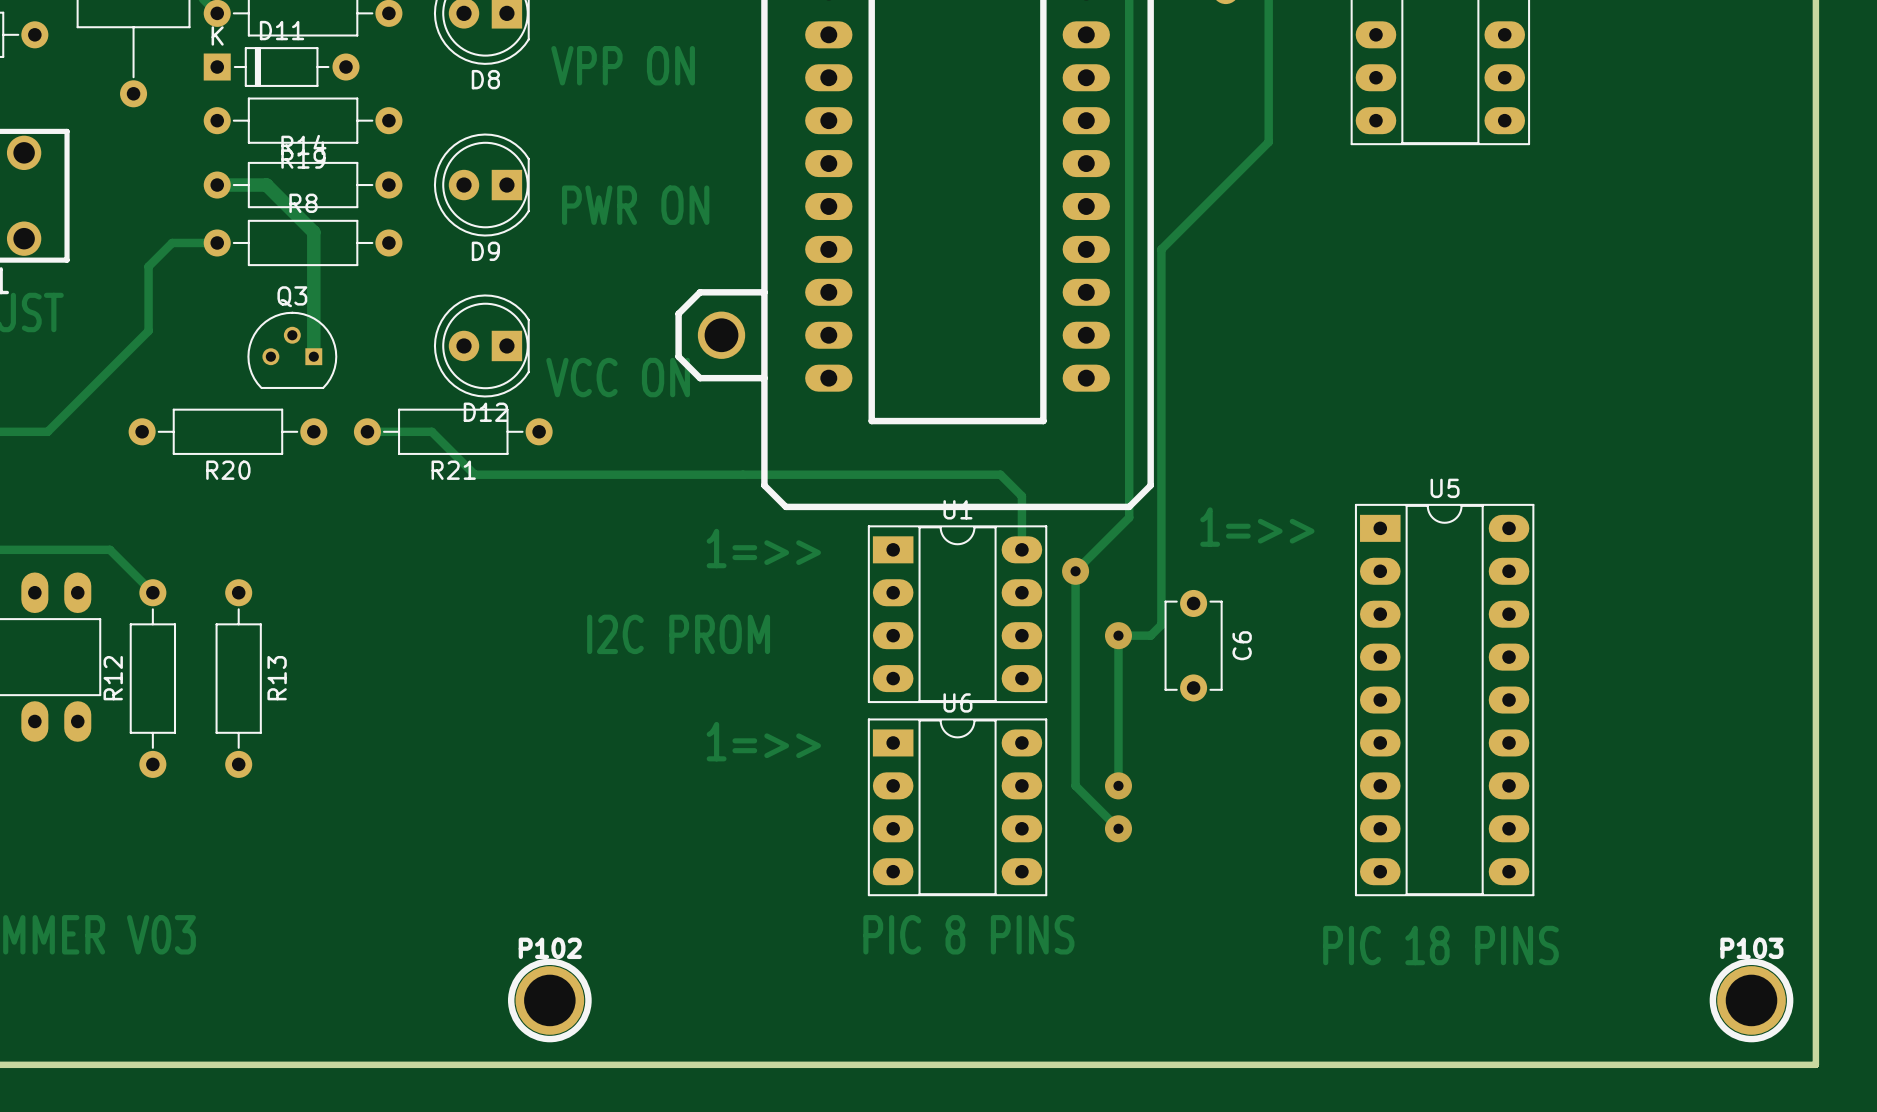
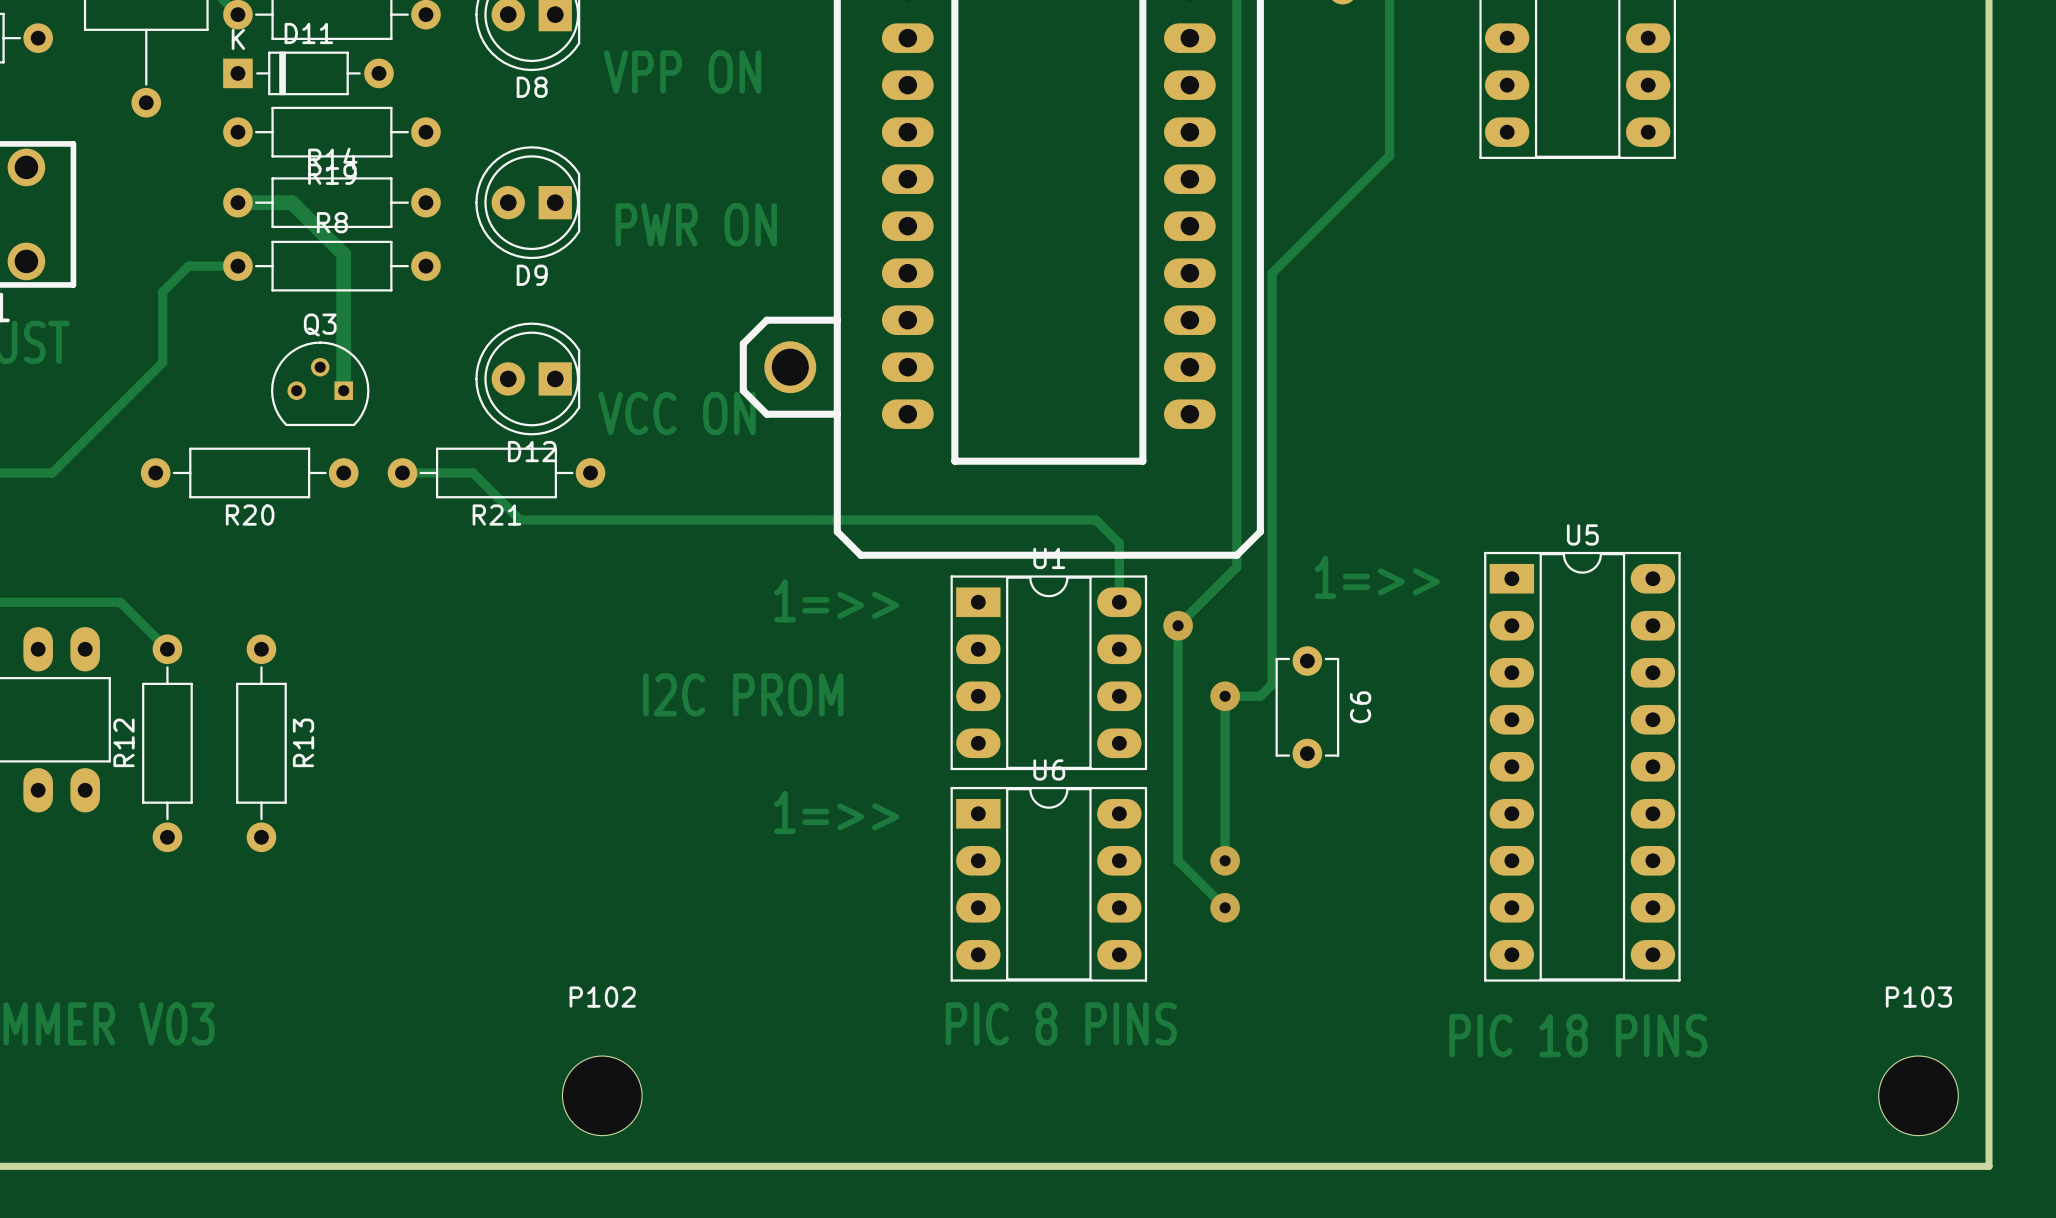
P102 name position: P102 (550, 948) -> P102 (602, 997)
P103 name position: P103 (1751, 948) -> P103 (1918, 997)
P102 footprint: [508, 958, 592, 1043] -> [562, 1056, 643, 1136]
P103 footprint: [1709, 958, 1794, 1043] -> [1878, 1056, 1959, 1136]

